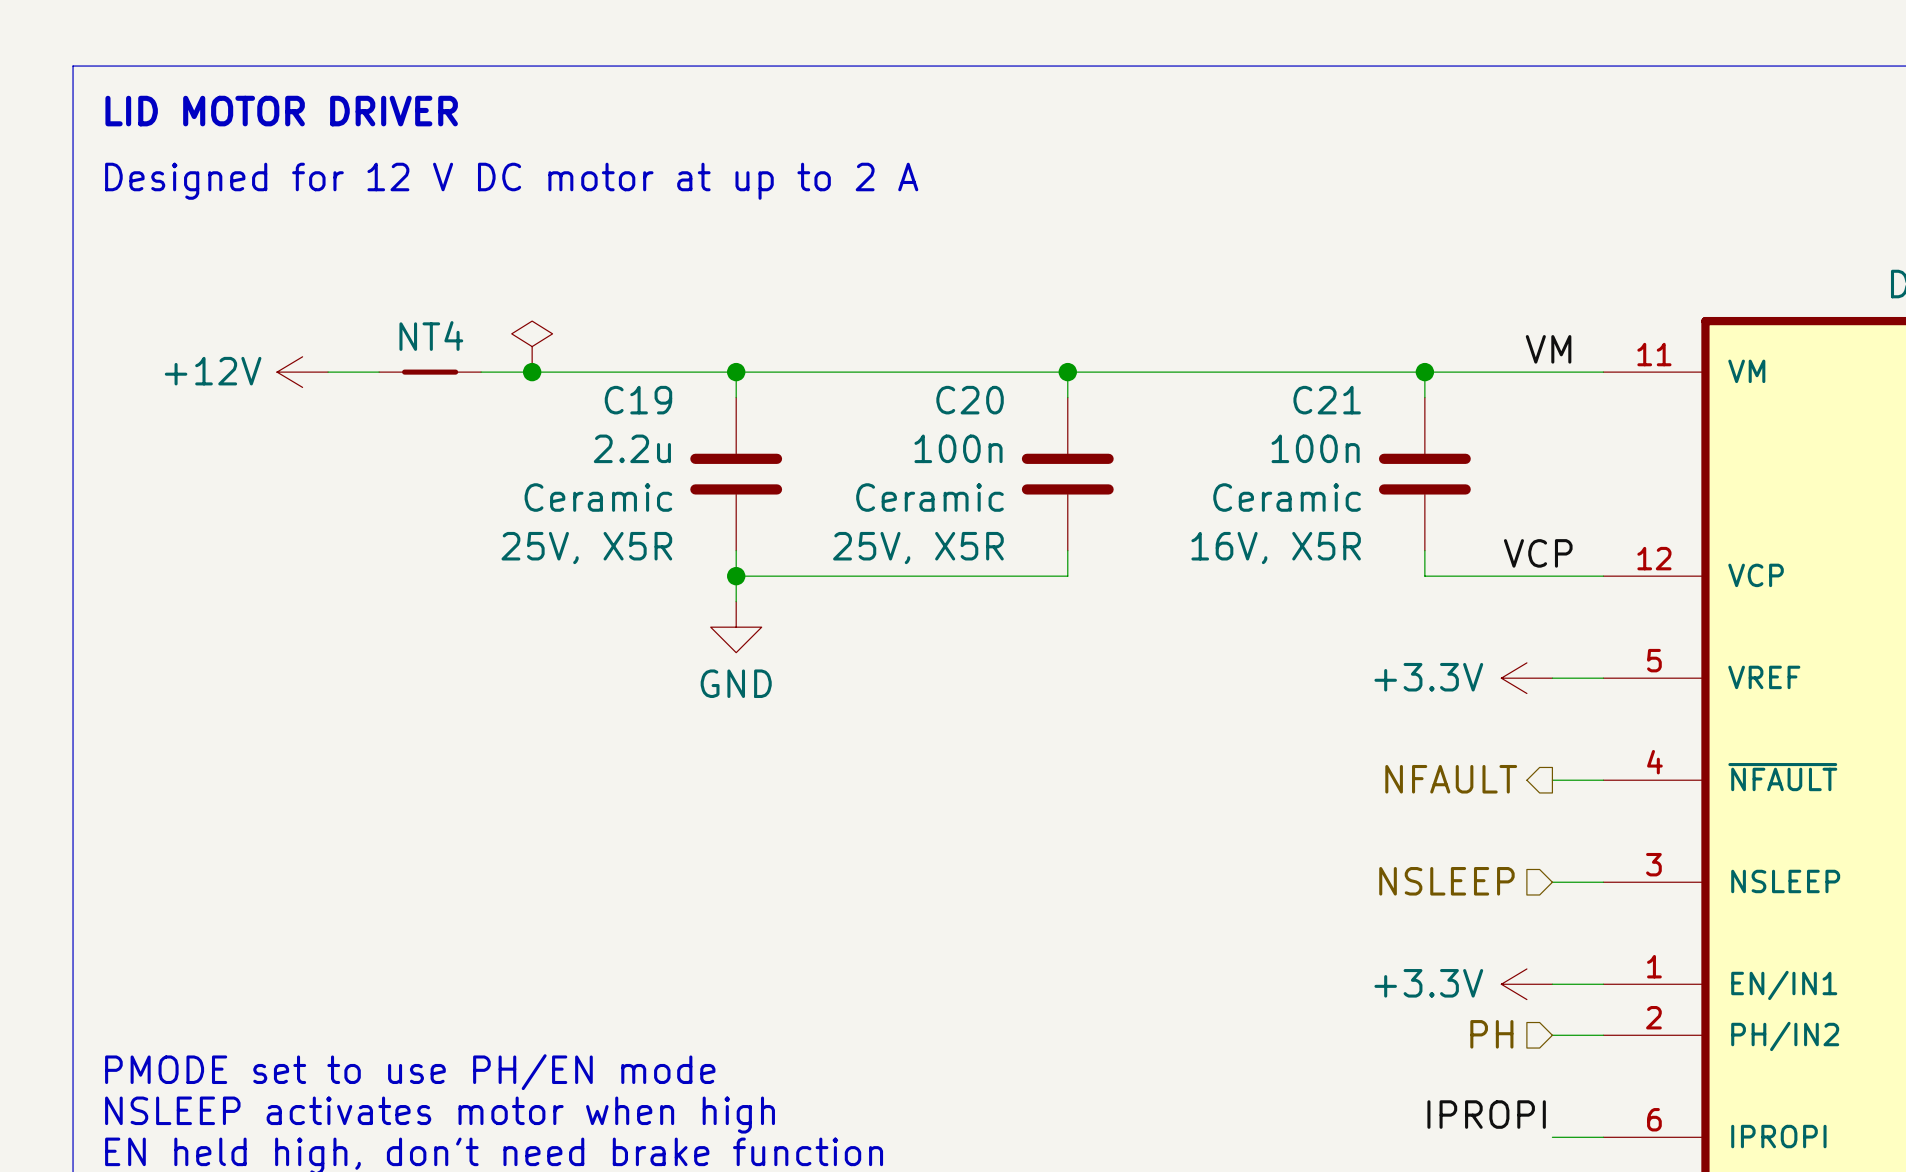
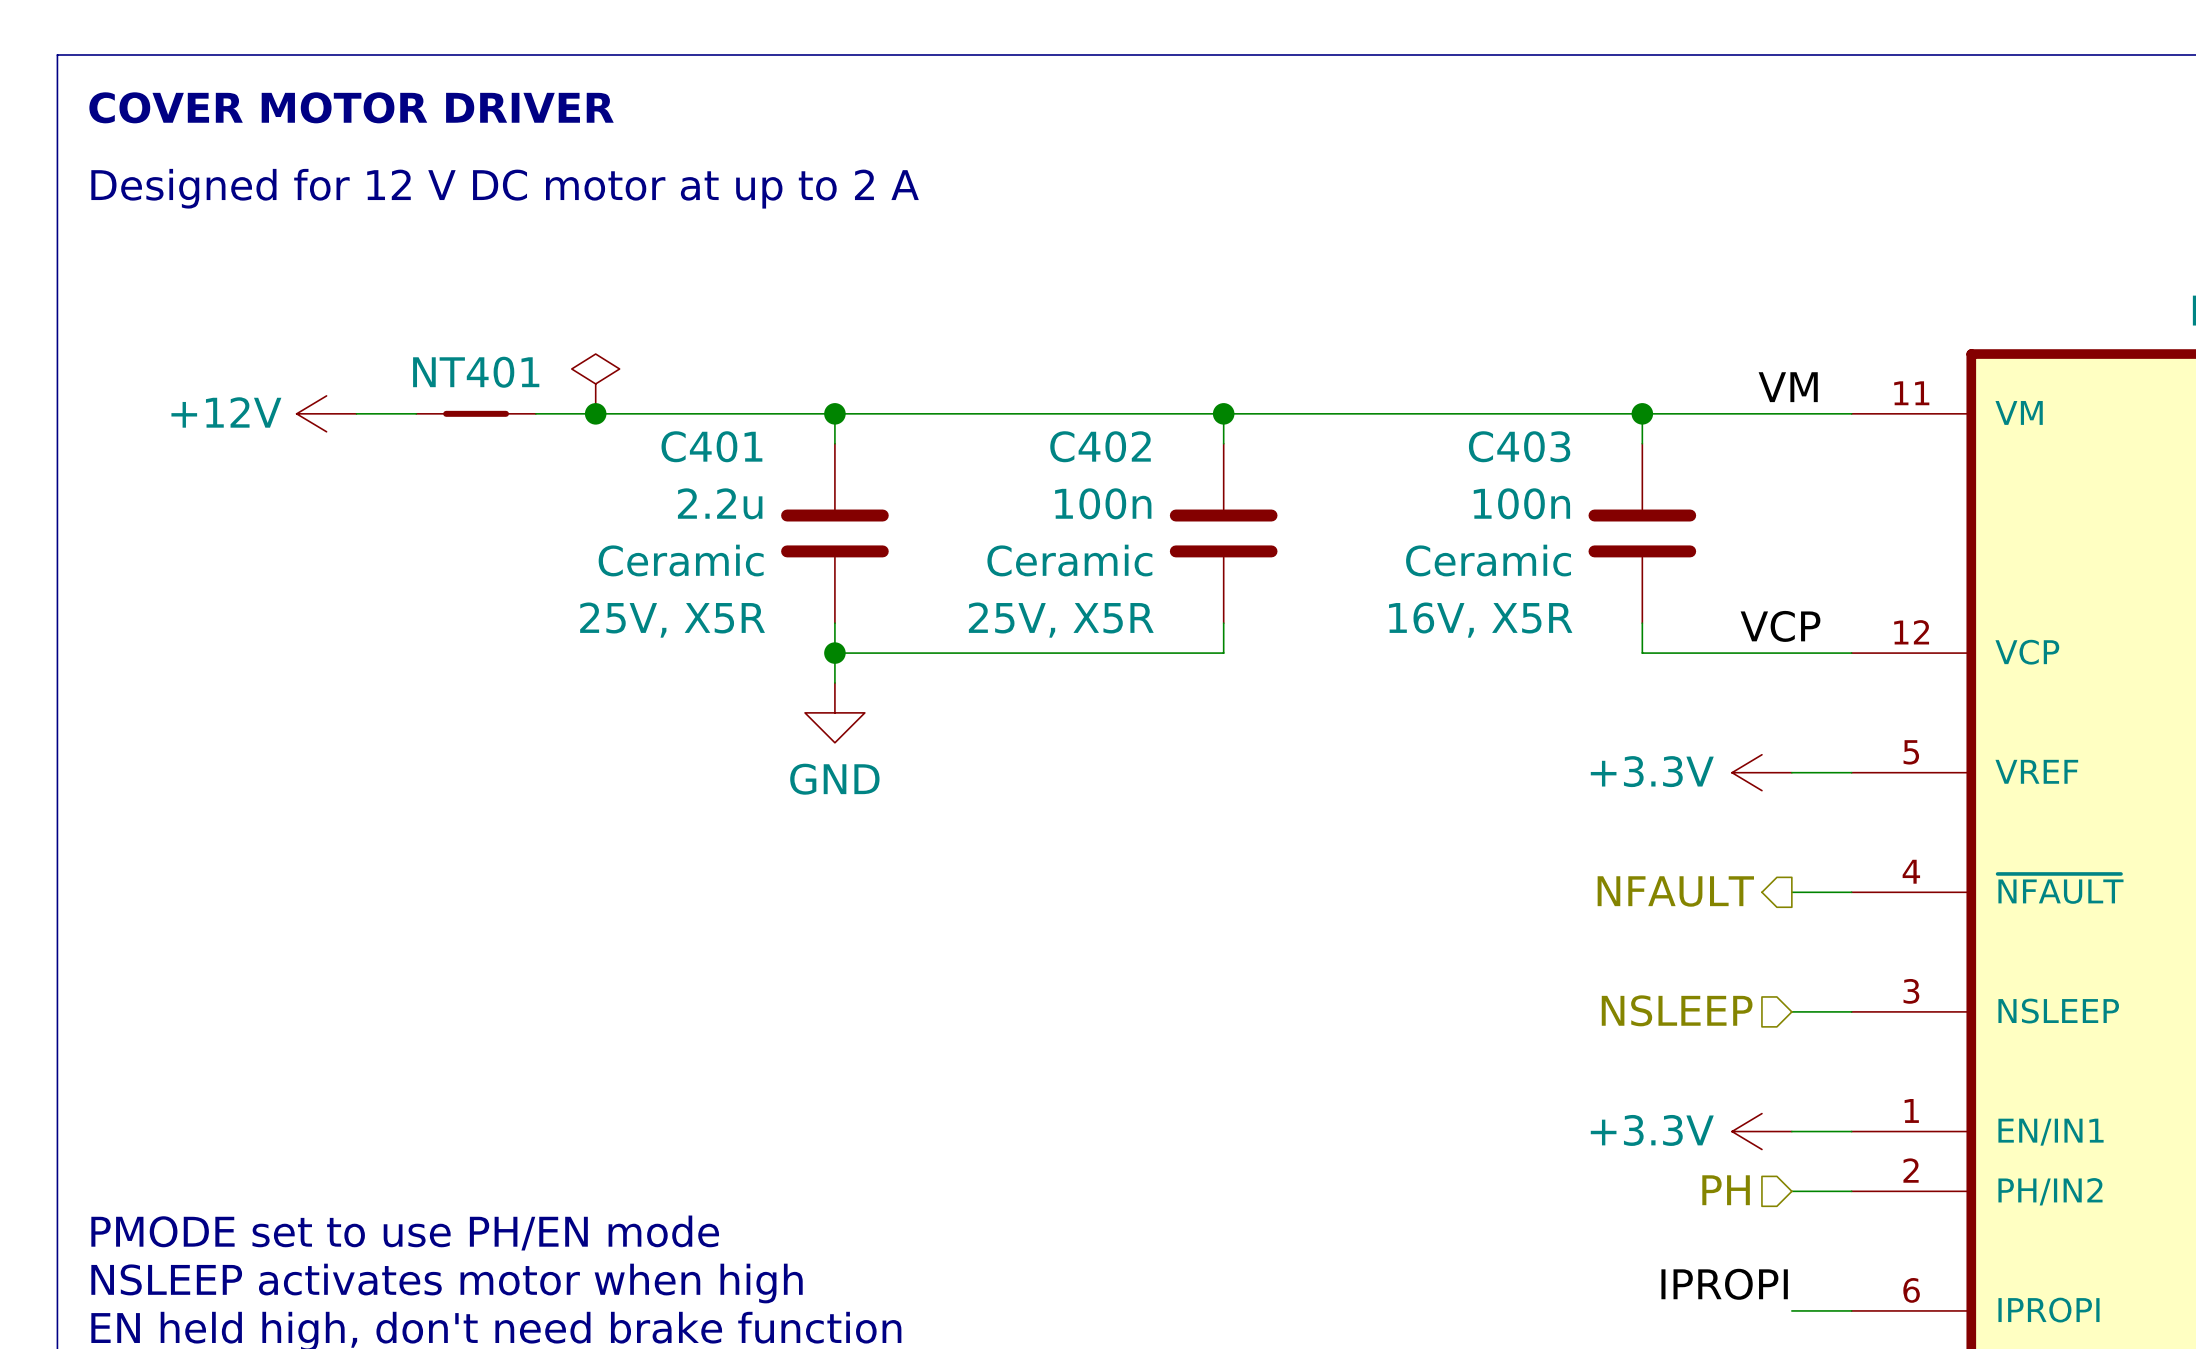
text: LID MOTOR DRIVER (281, 111) -> COVER MOTOR DRIVER (351, 107)
NT4 name: NT4 (431, 336) -> NT401 (476, 372)
C19 name: C19 (638, 400) -> C401 (711, 446)
C20 name: C20 (970, 400) -> C402 (1100, 446)
C21 name: C21 (1327, 400) -> C403 (1519, 446)

